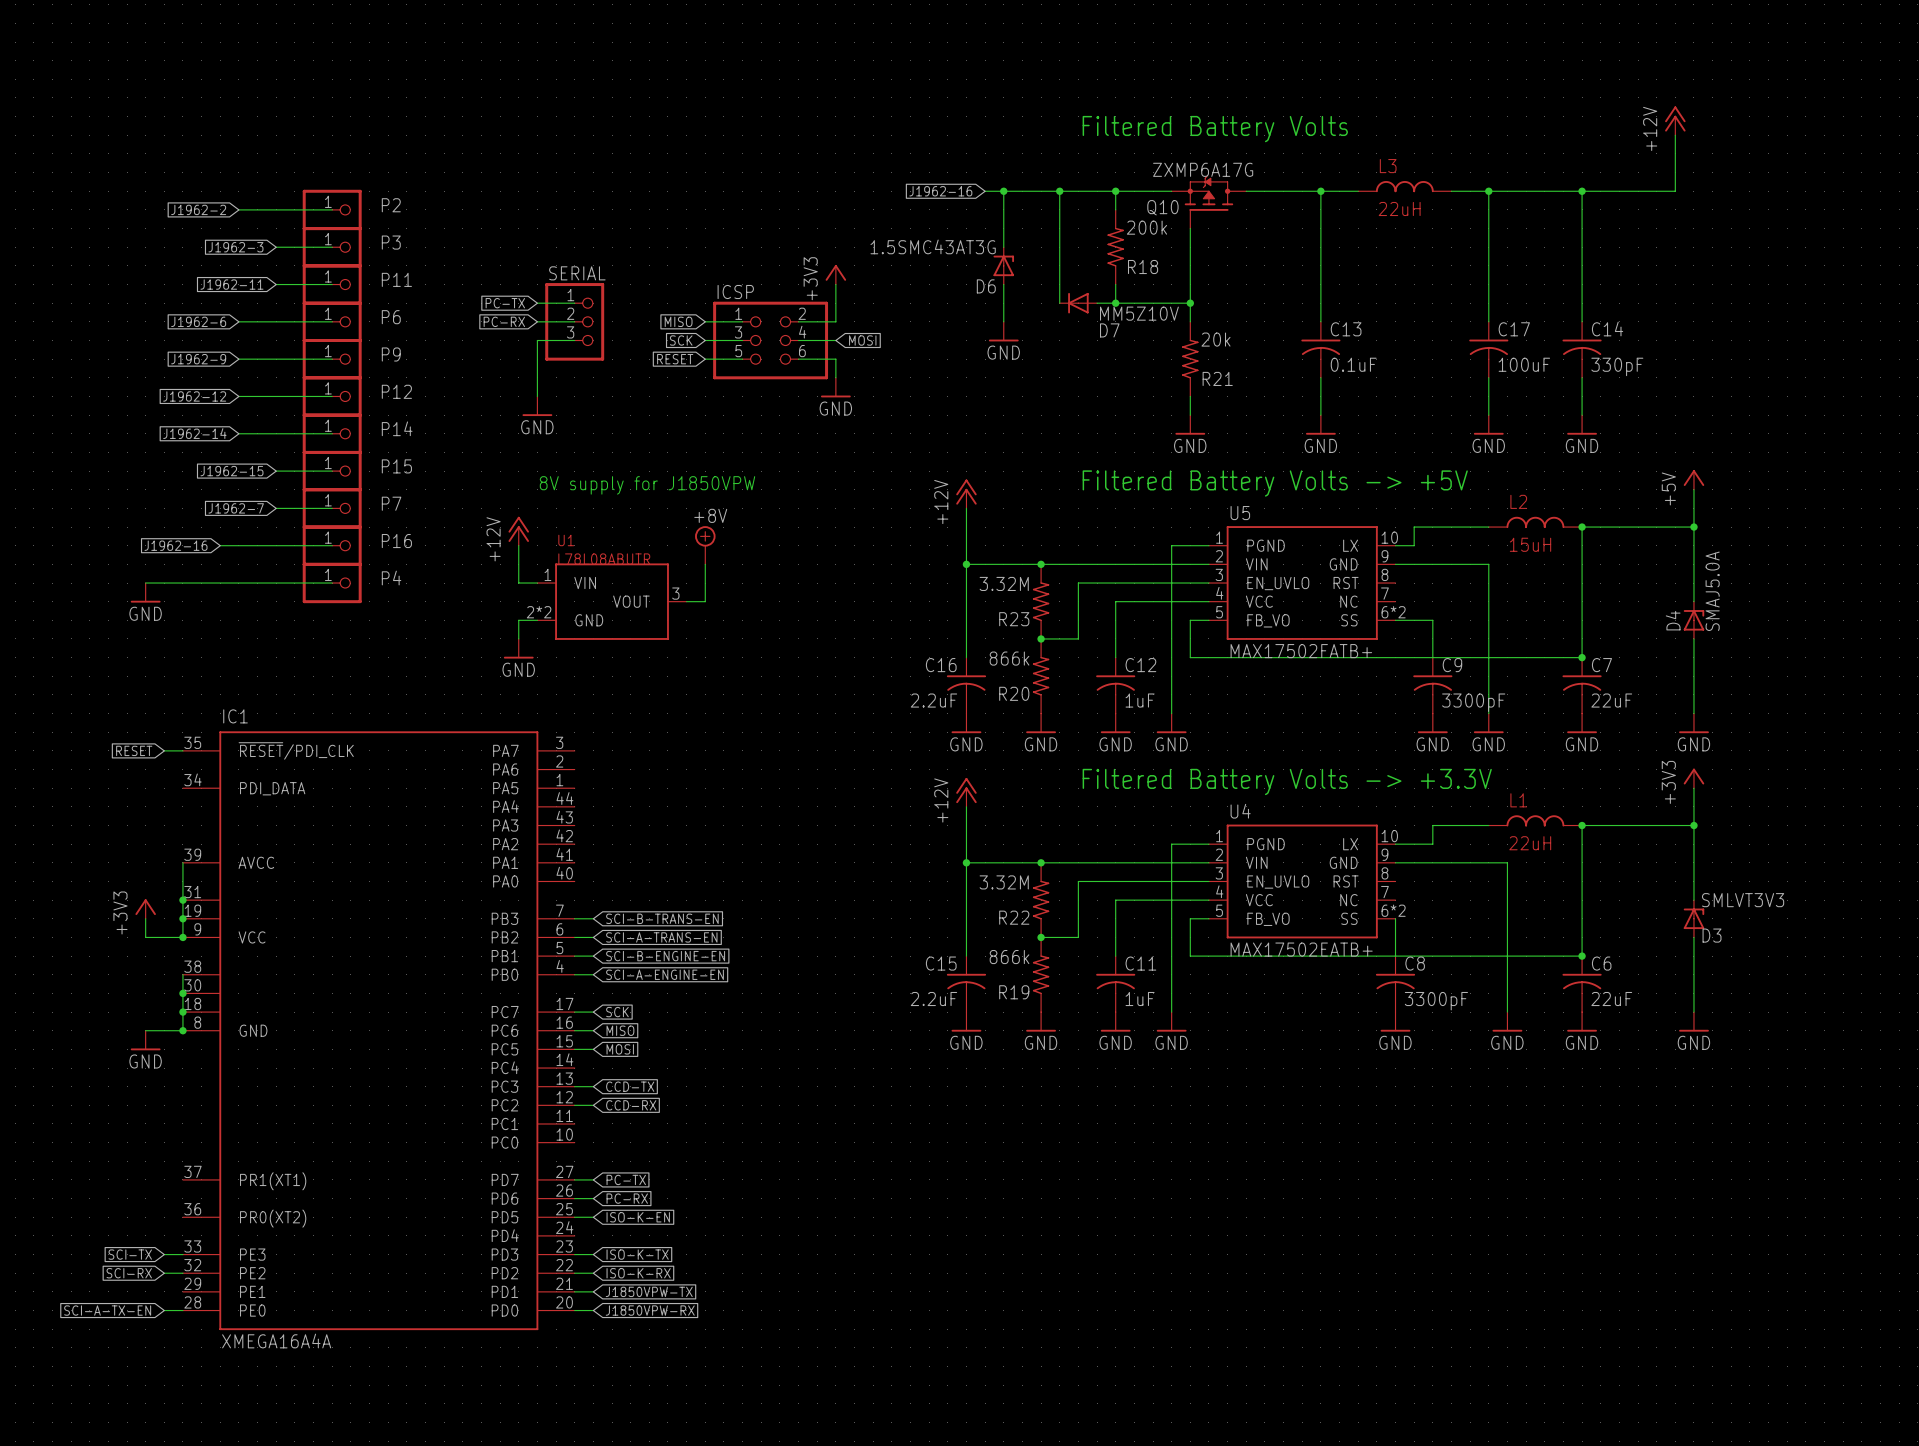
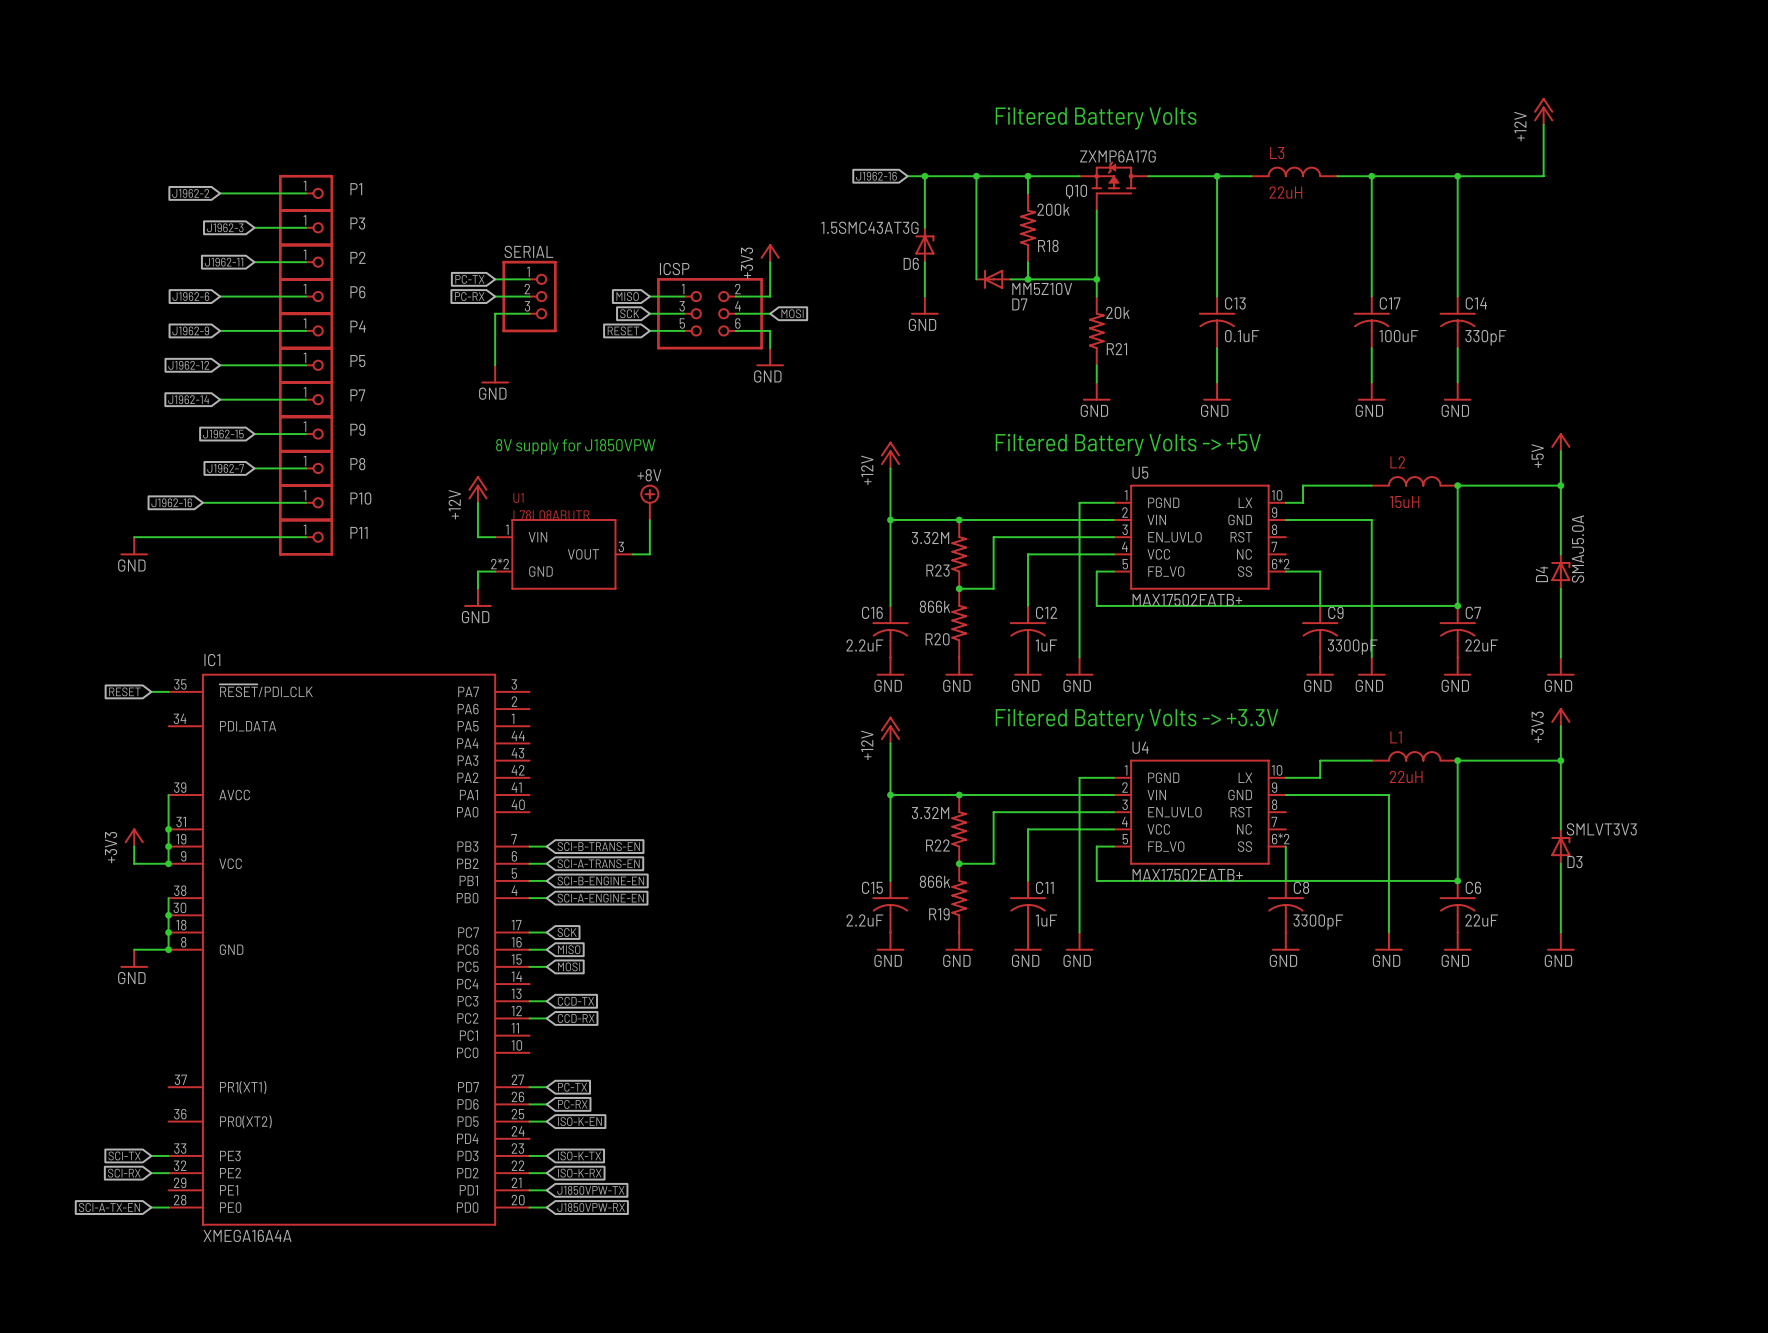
P2 name: P2 (391, 205) -> P1 (356, 189)
P11 name: P11 (396, 279) -> P2 (358, 257)
P9 name: P9 (391, 354) -> P4 (358, 326)
P12 name: P12 (396, 391) -> P5 (357, 361)
P14 name: P14 (397, 428) -> P7 (357, 395)
P15 name: P15 (396, 466) -> P9 (357, 429)
P7 name: P7 (391, 503) -> P8 (357, 464)
P16 name: P16 (396, 541) -> P10 (360, 498)
P4 name: P4 (391, 578) -> P11 (359, 532)

